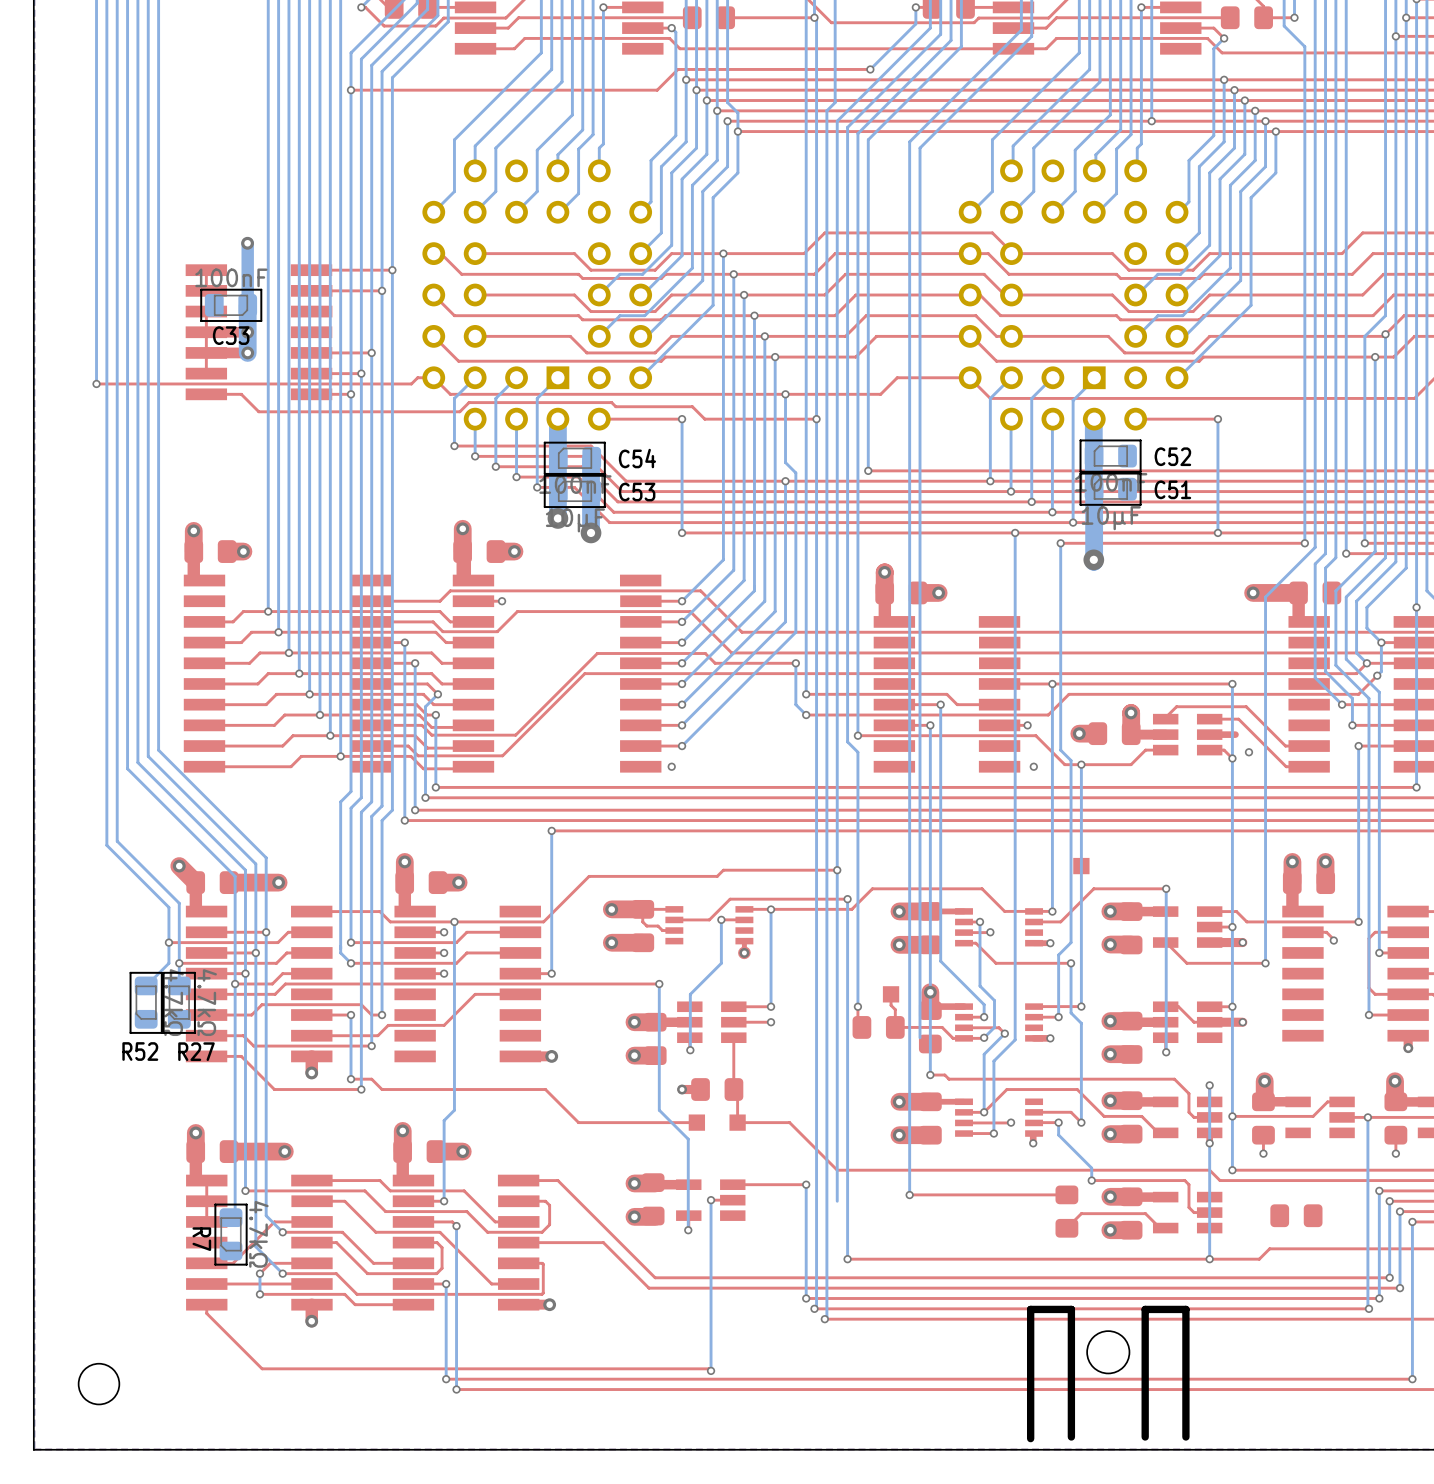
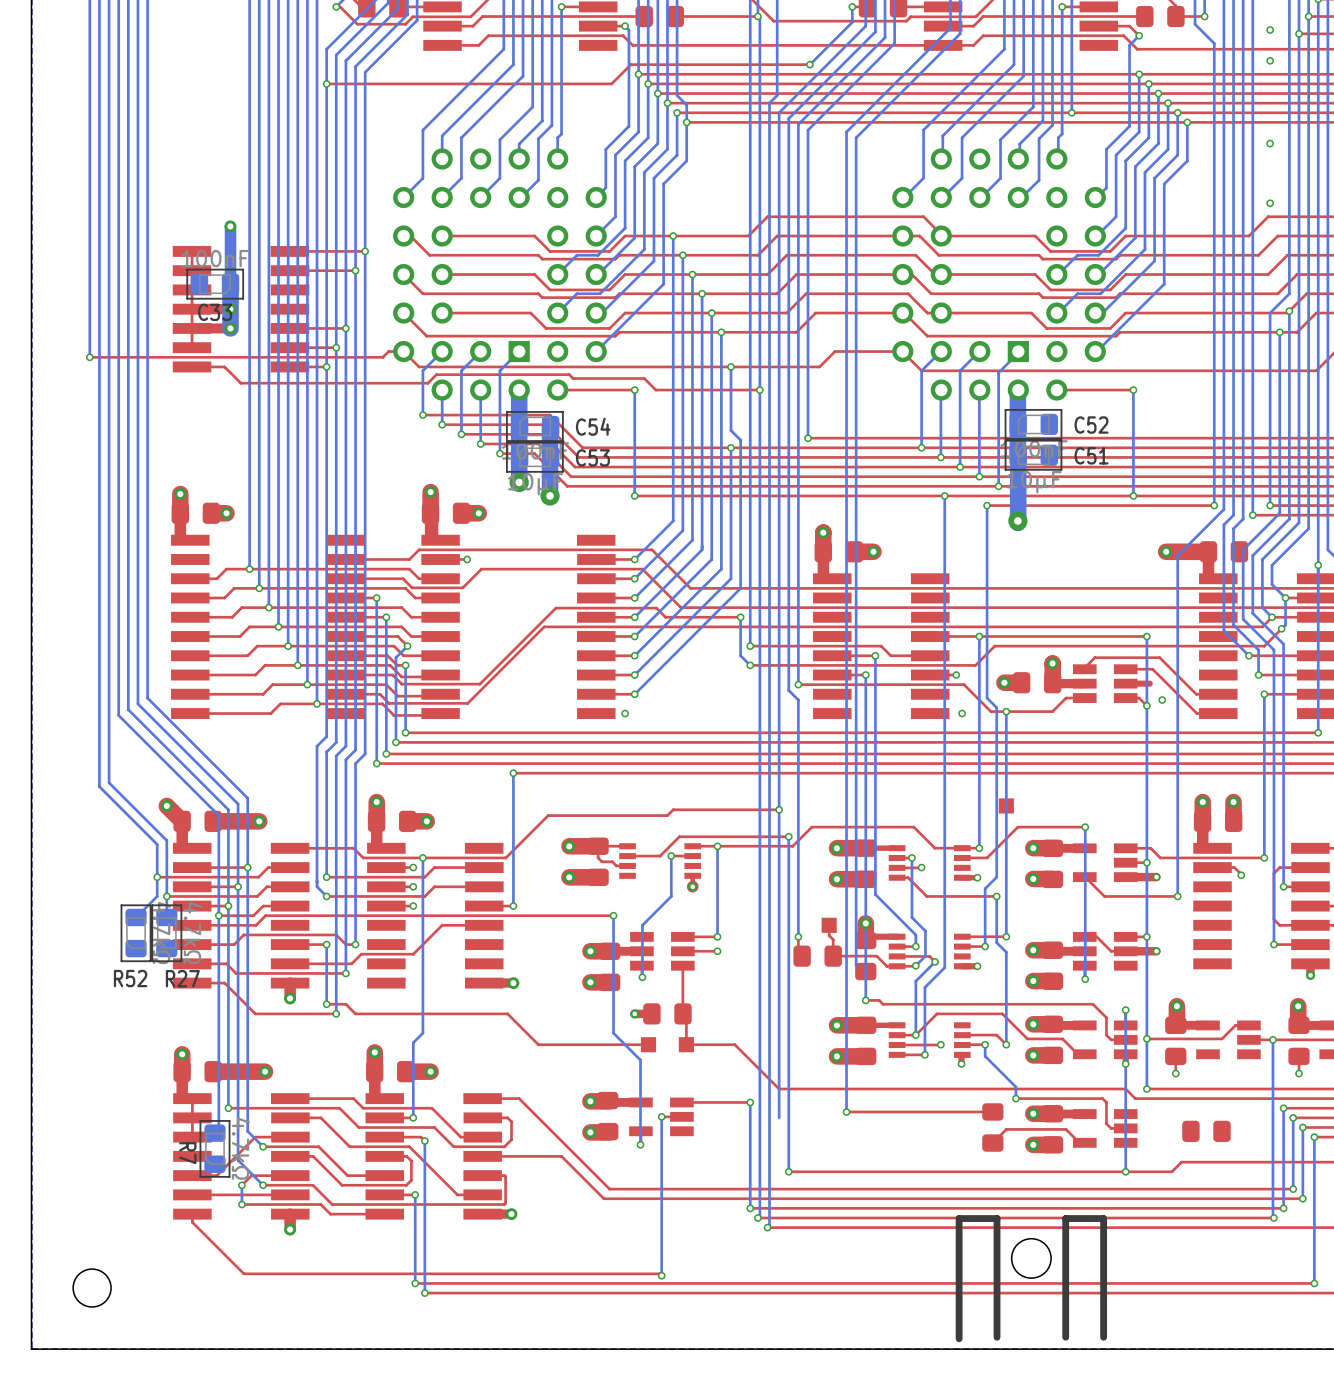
via: none -> (1270, 29)
via: none -> (1270, 60)
via: none -> (1270, 143)
via: none -> (1270, 203)

